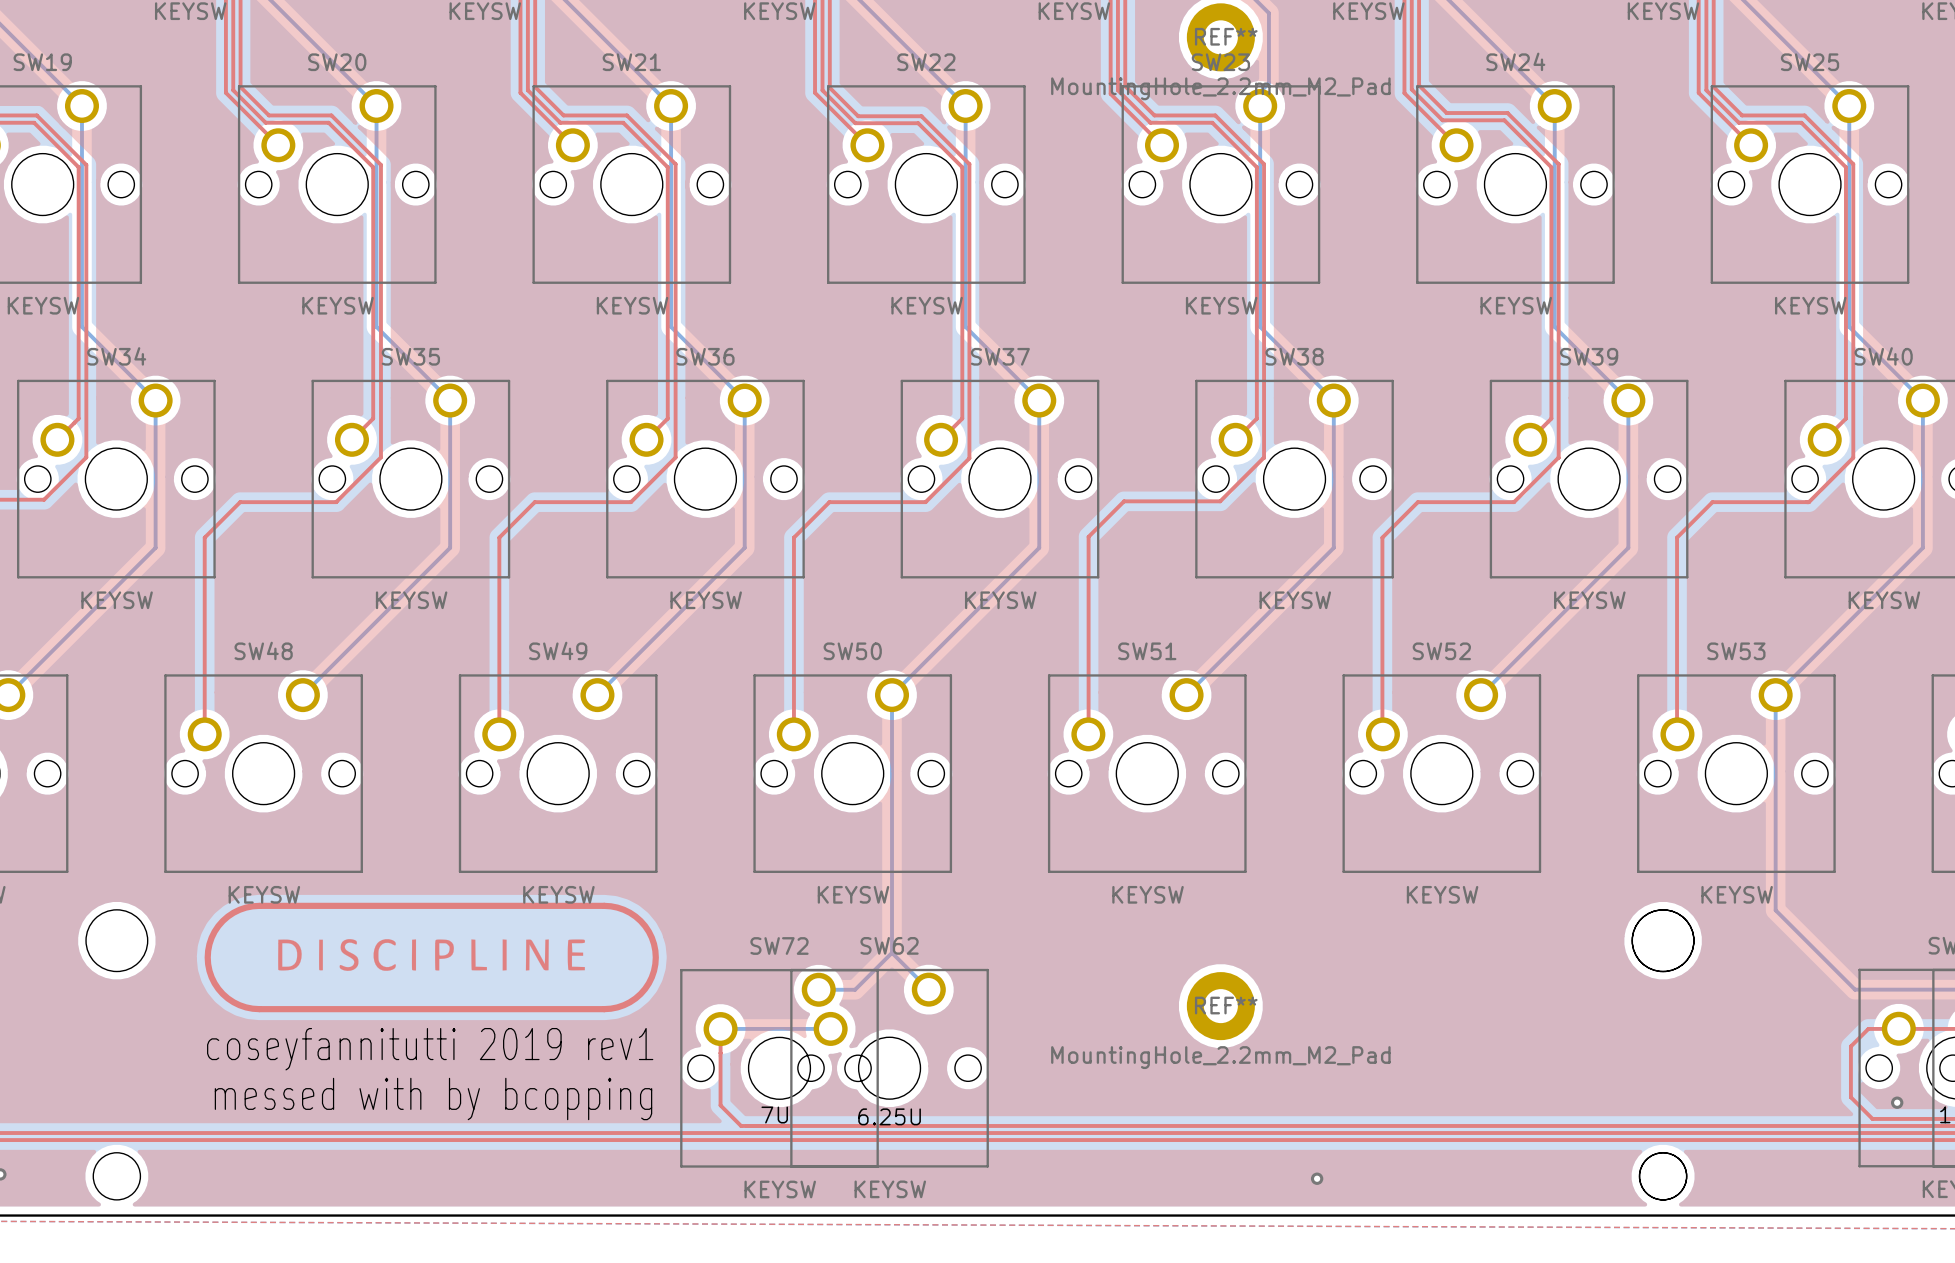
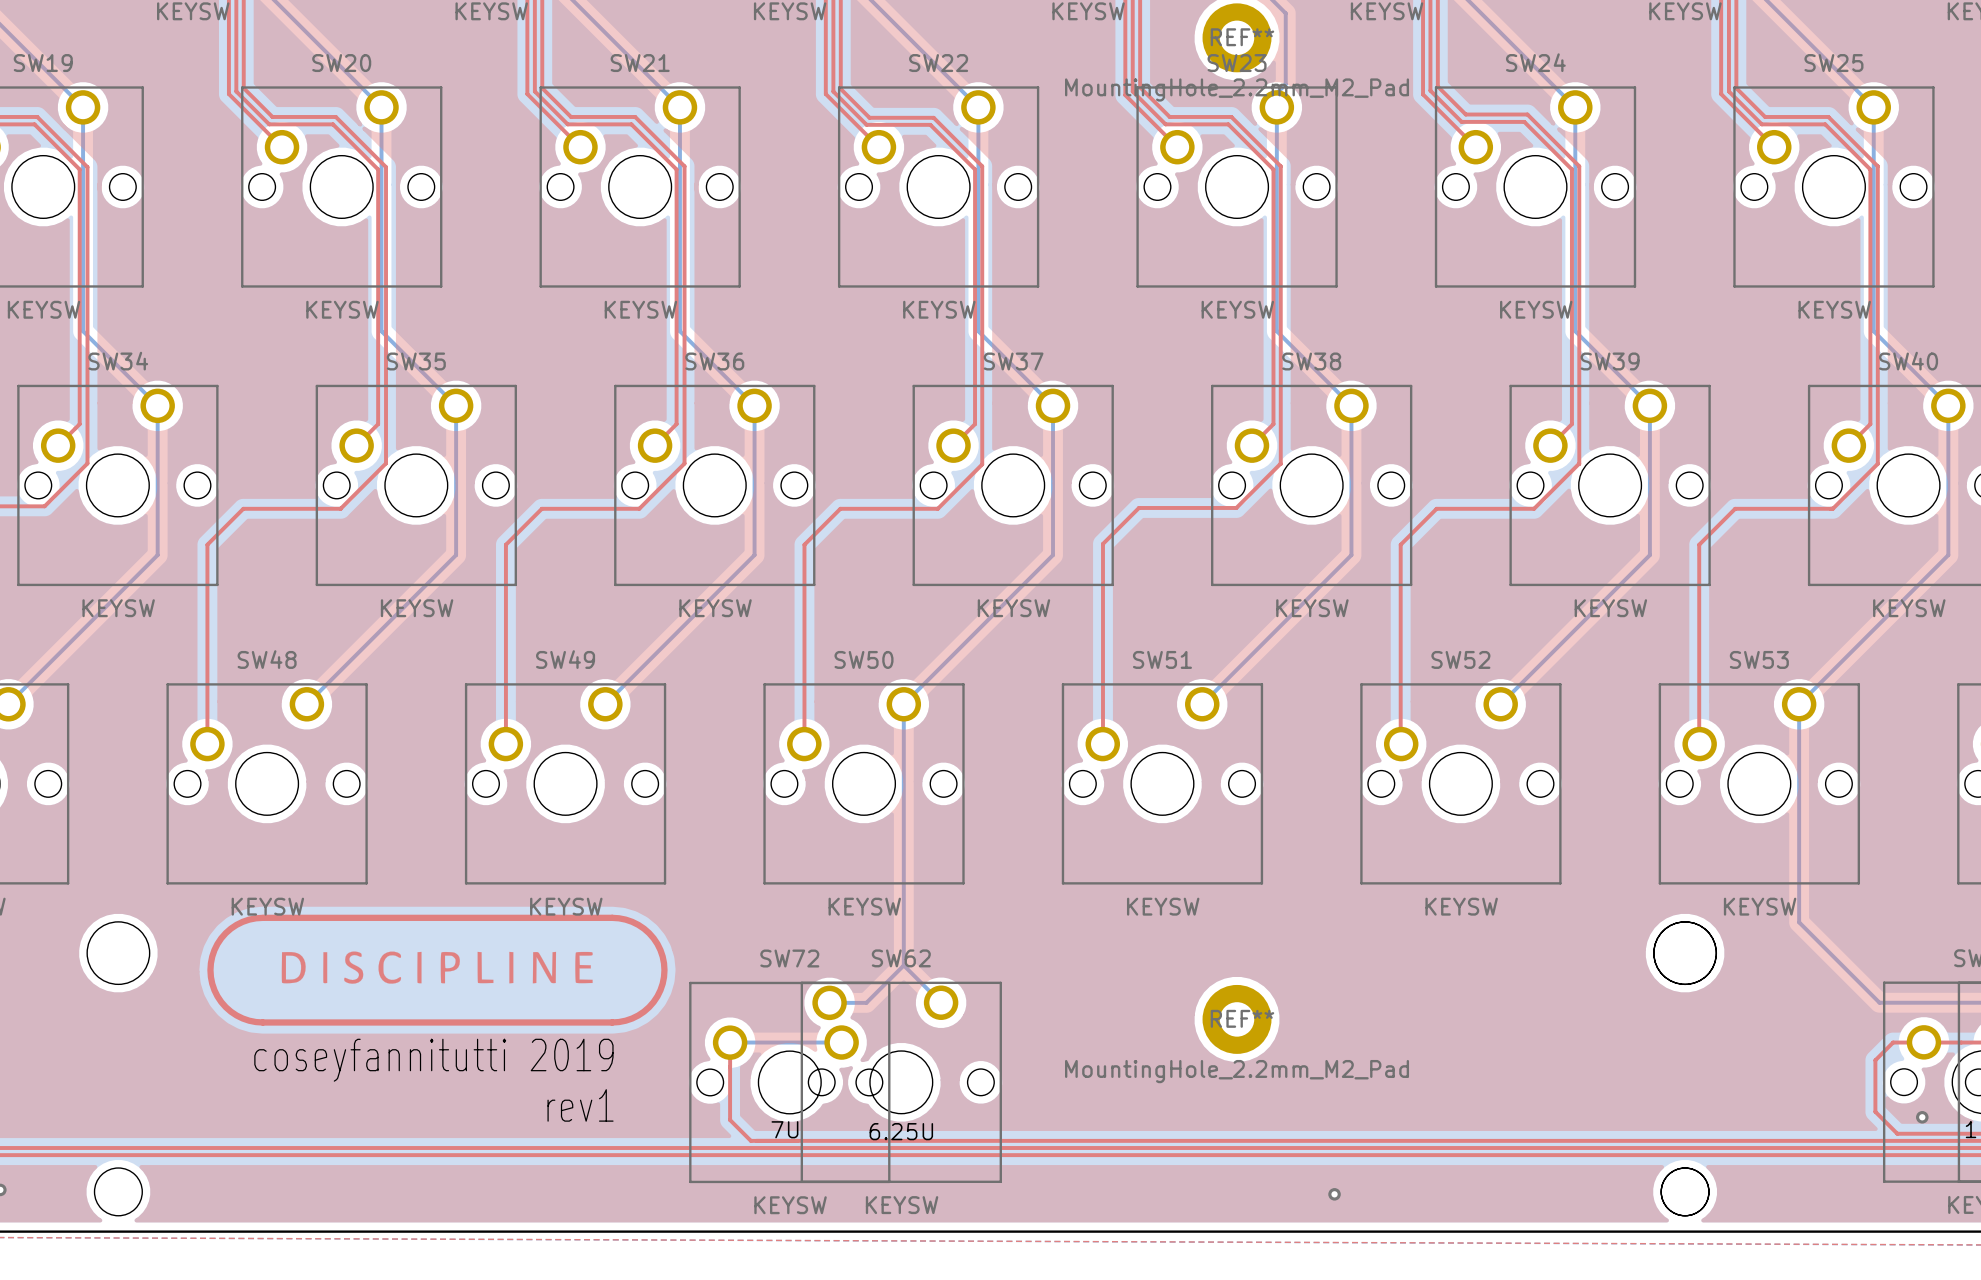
text: coseyfannitutti 2019 rev1 (430, 1049) -> coseyfannitutti 2019 (433, 1060)
text: none -> rev1 (580, 1105)
text: messed with by bcopping (433, 1099) -> none

